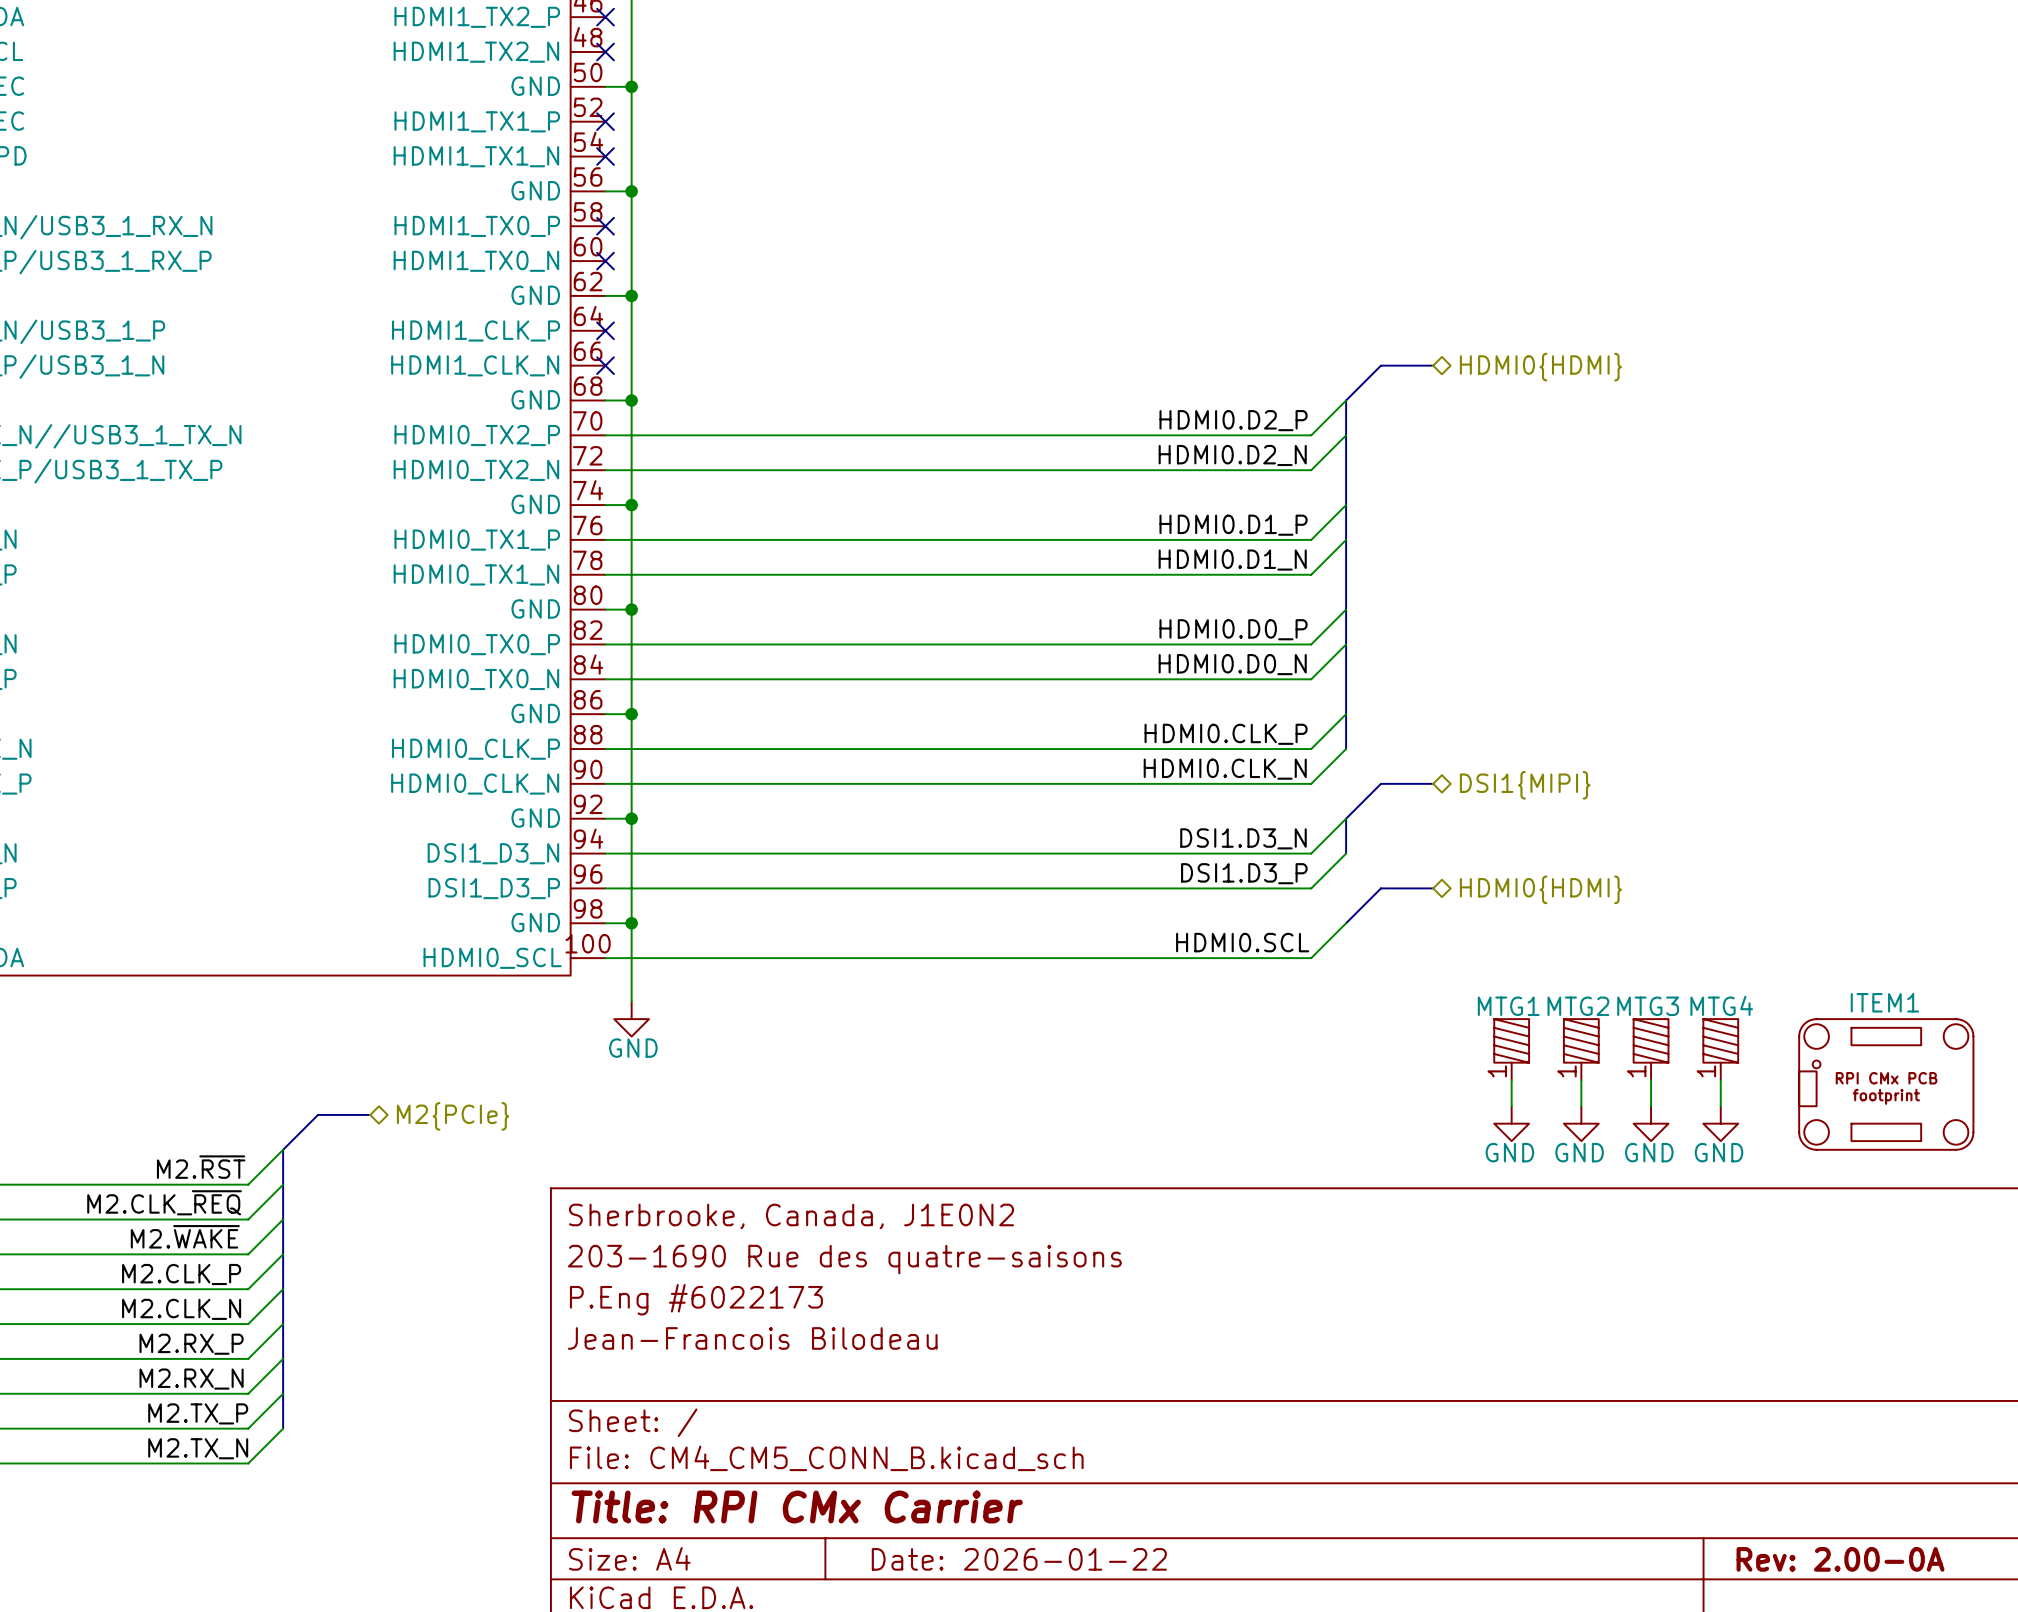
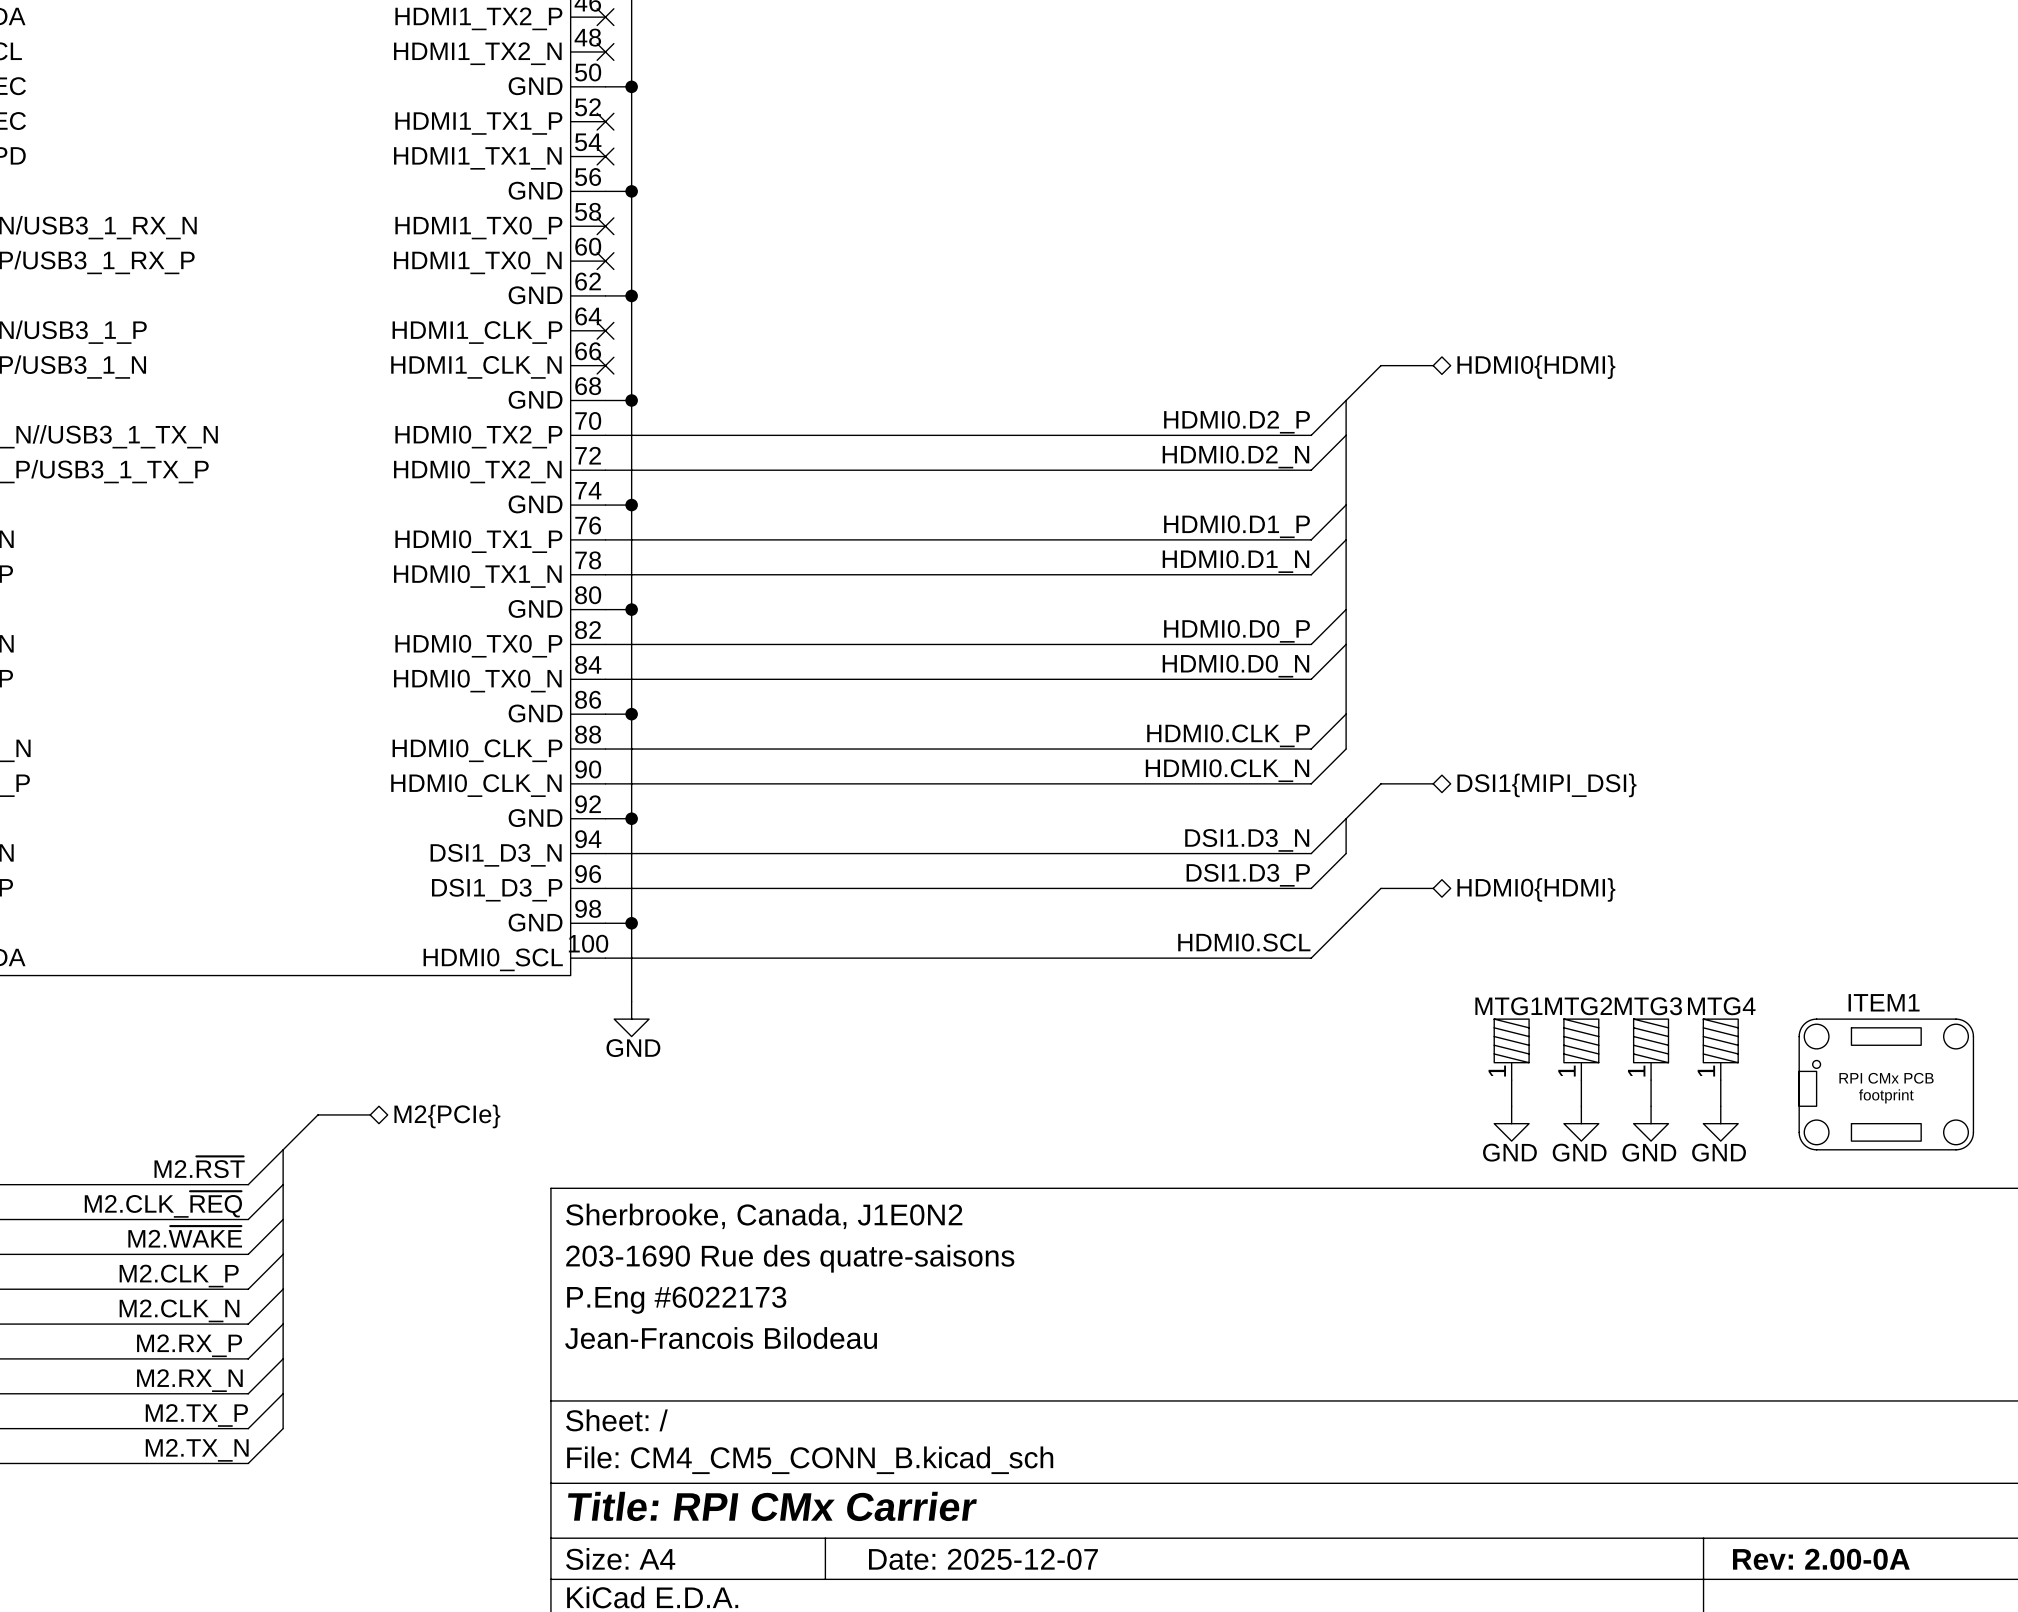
hierarchical label: DSI1{MIPI} (1525, 785) -> DSI1{MIPI_DSI} (1546, 785)
title block: Date: 2026-01-22 (1019, 1559) -> Date: 2025-12-07 (983, 1559)

